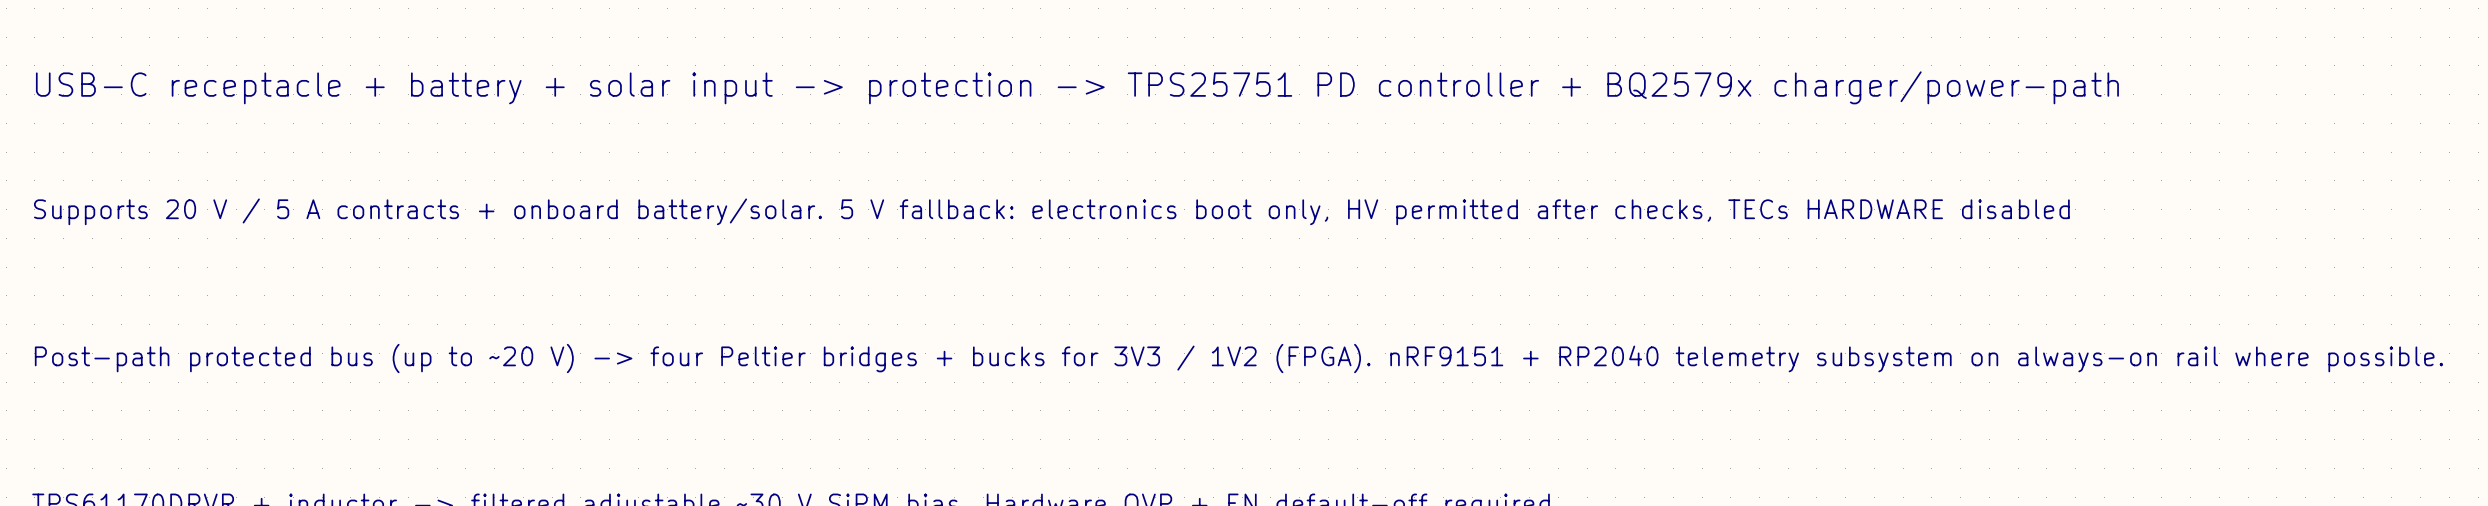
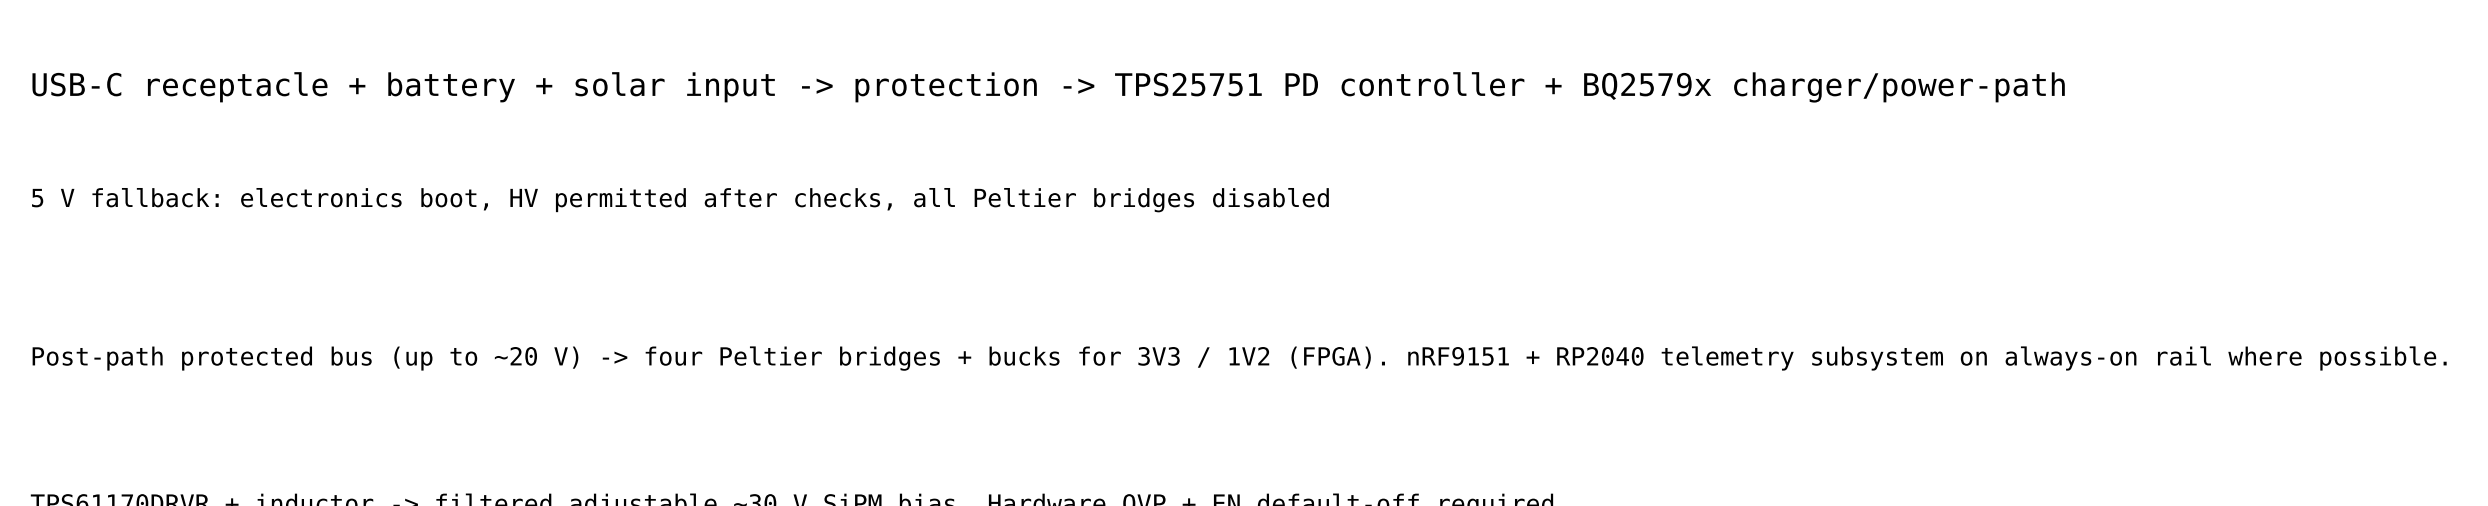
text: Supports 20 V / 5 A contracts + onboard battery/solar. 5 V fallback: electronics boot only, HV permitted after checks, TECs HARDWARE disabled (1051, 211) -> 5 V fallback: electronics boot, HV permitted after checks, all Peltier bridges disabled (680, 200)

